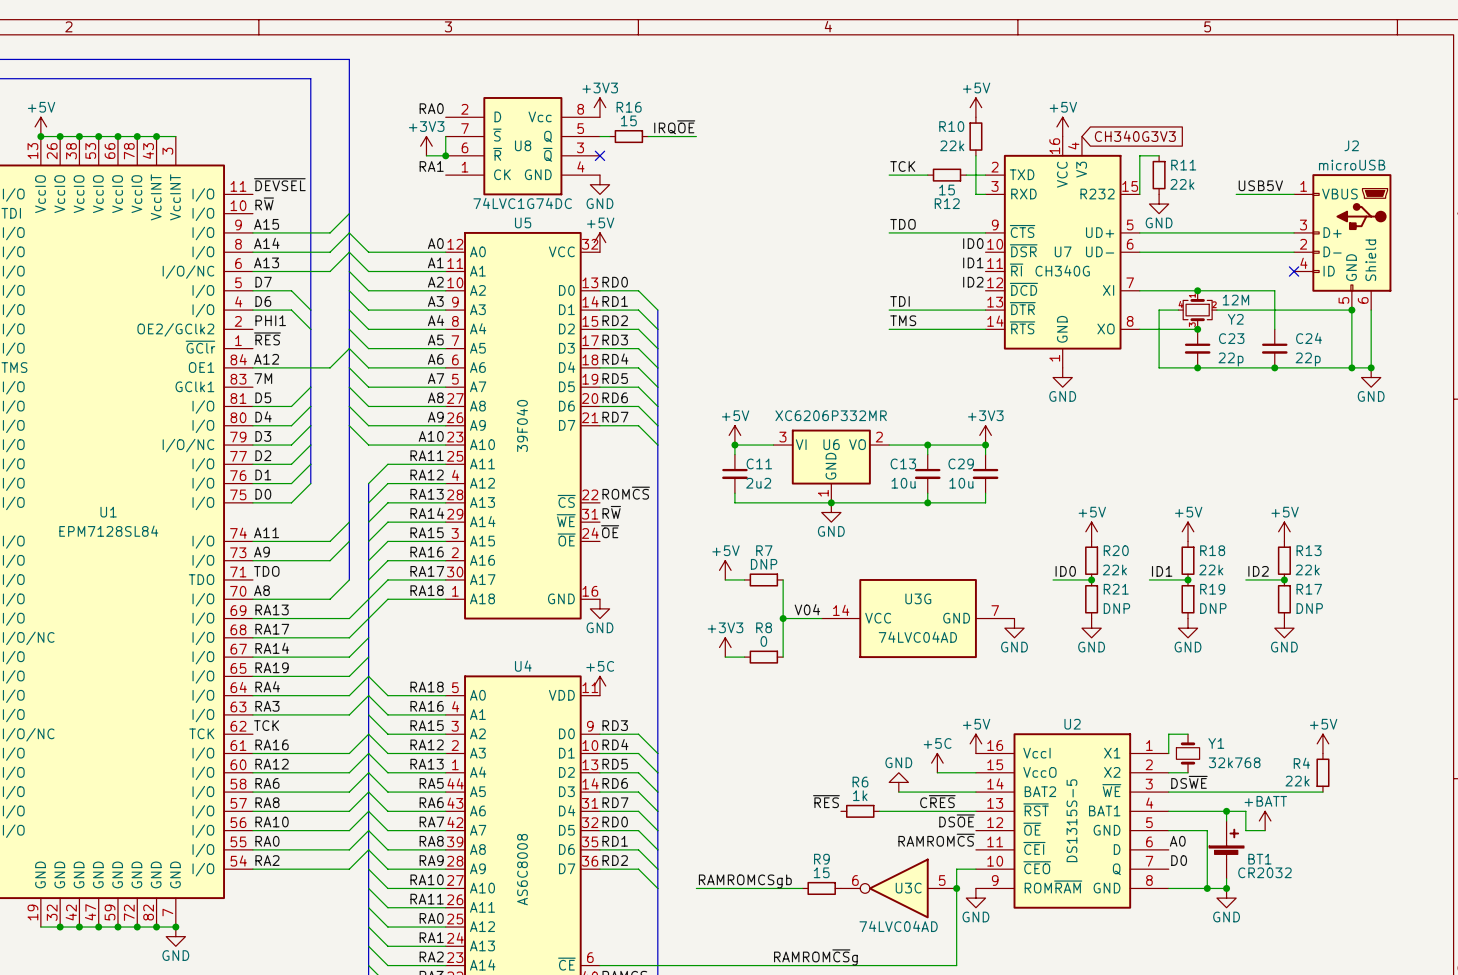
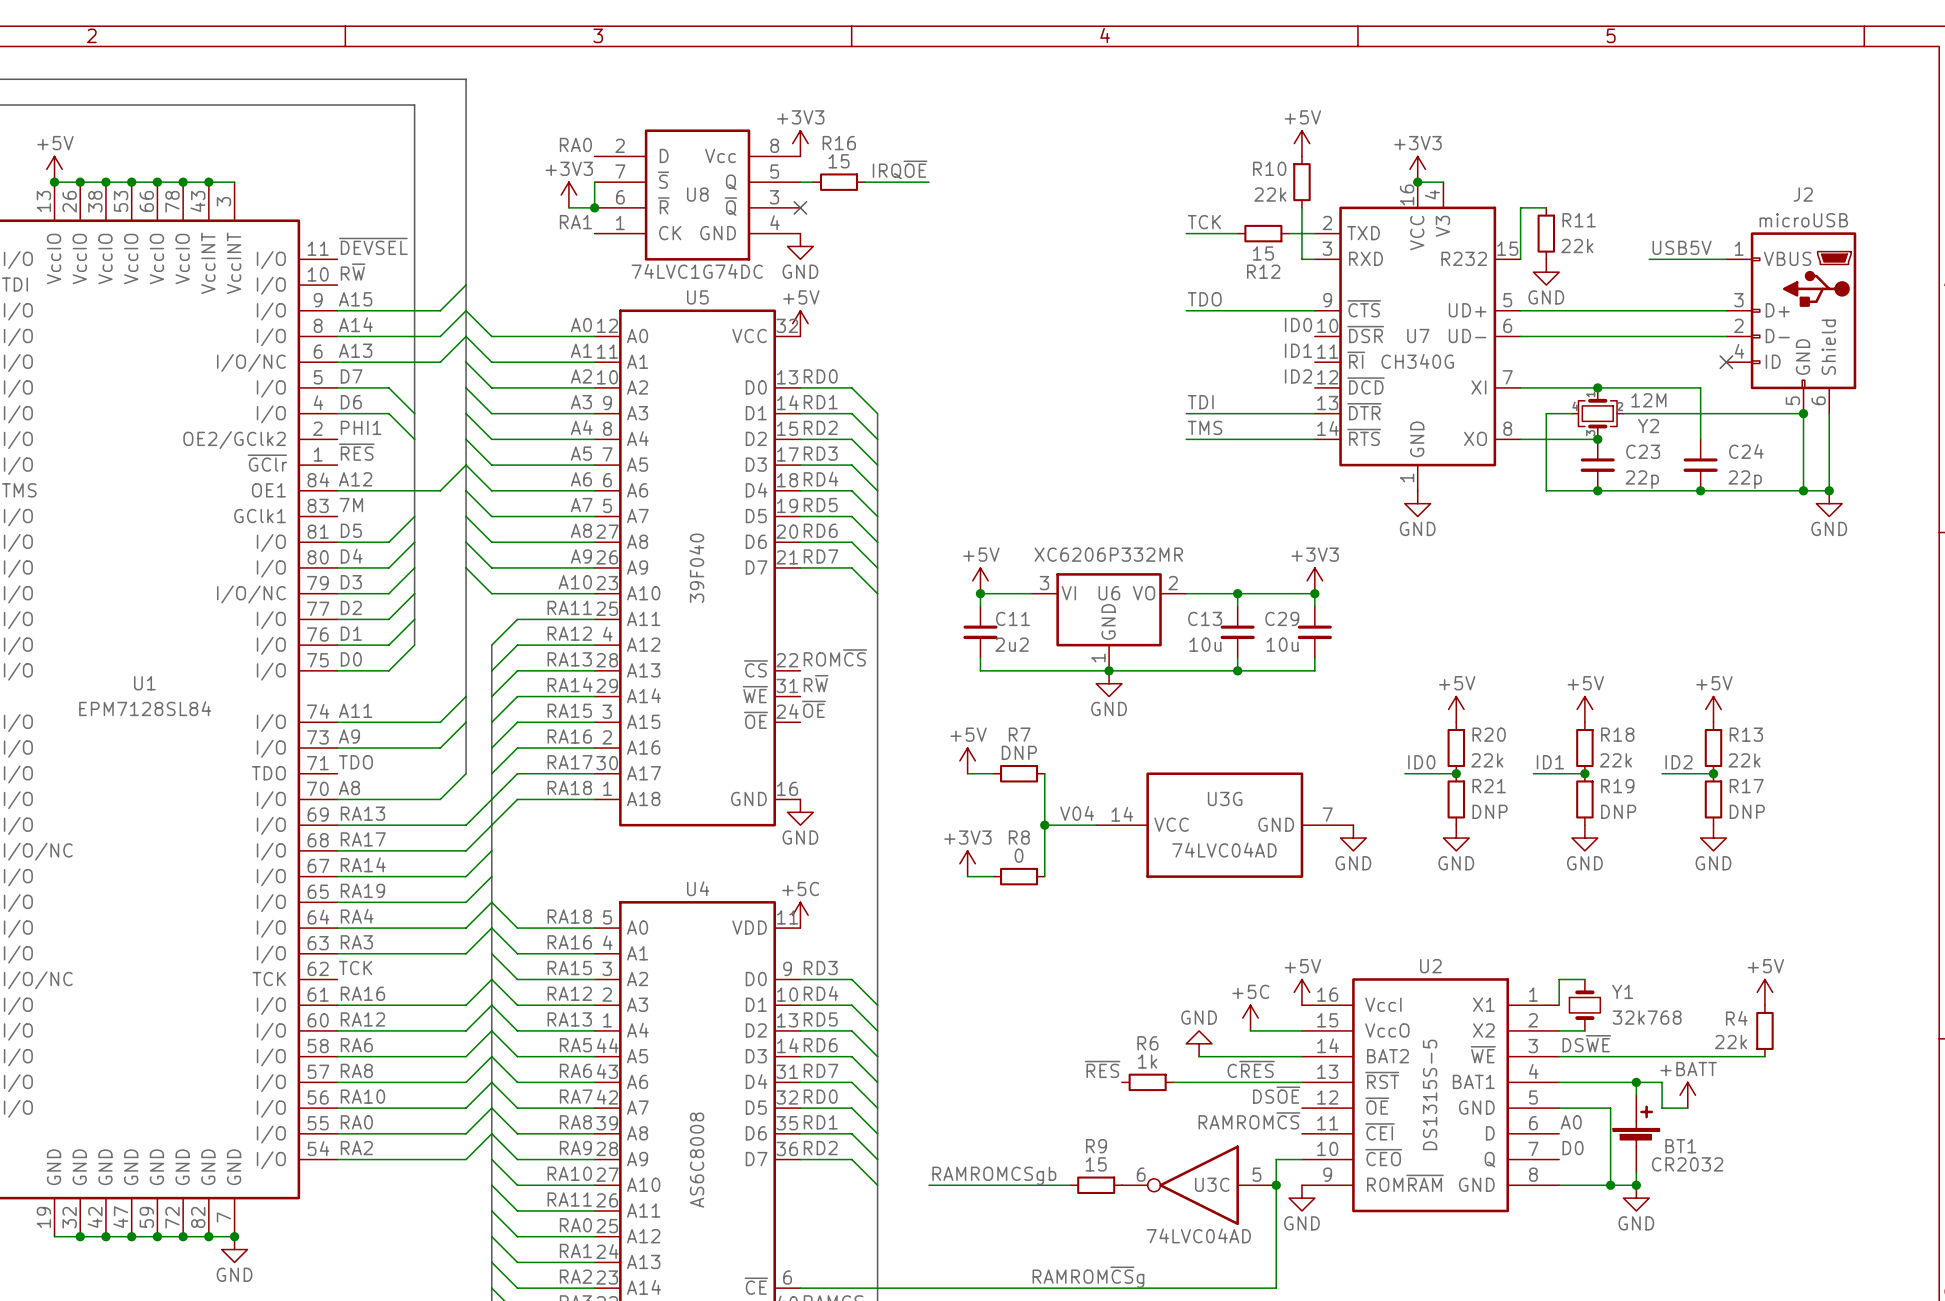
power symbol: +5V (1062, 126) -> +3V3 (1417, 169)
wire: none -> (1417, 182) (1443, 182)
junction: none -> (1417, 182)
global label: CH340G3V3 (1135, 136) -> none

